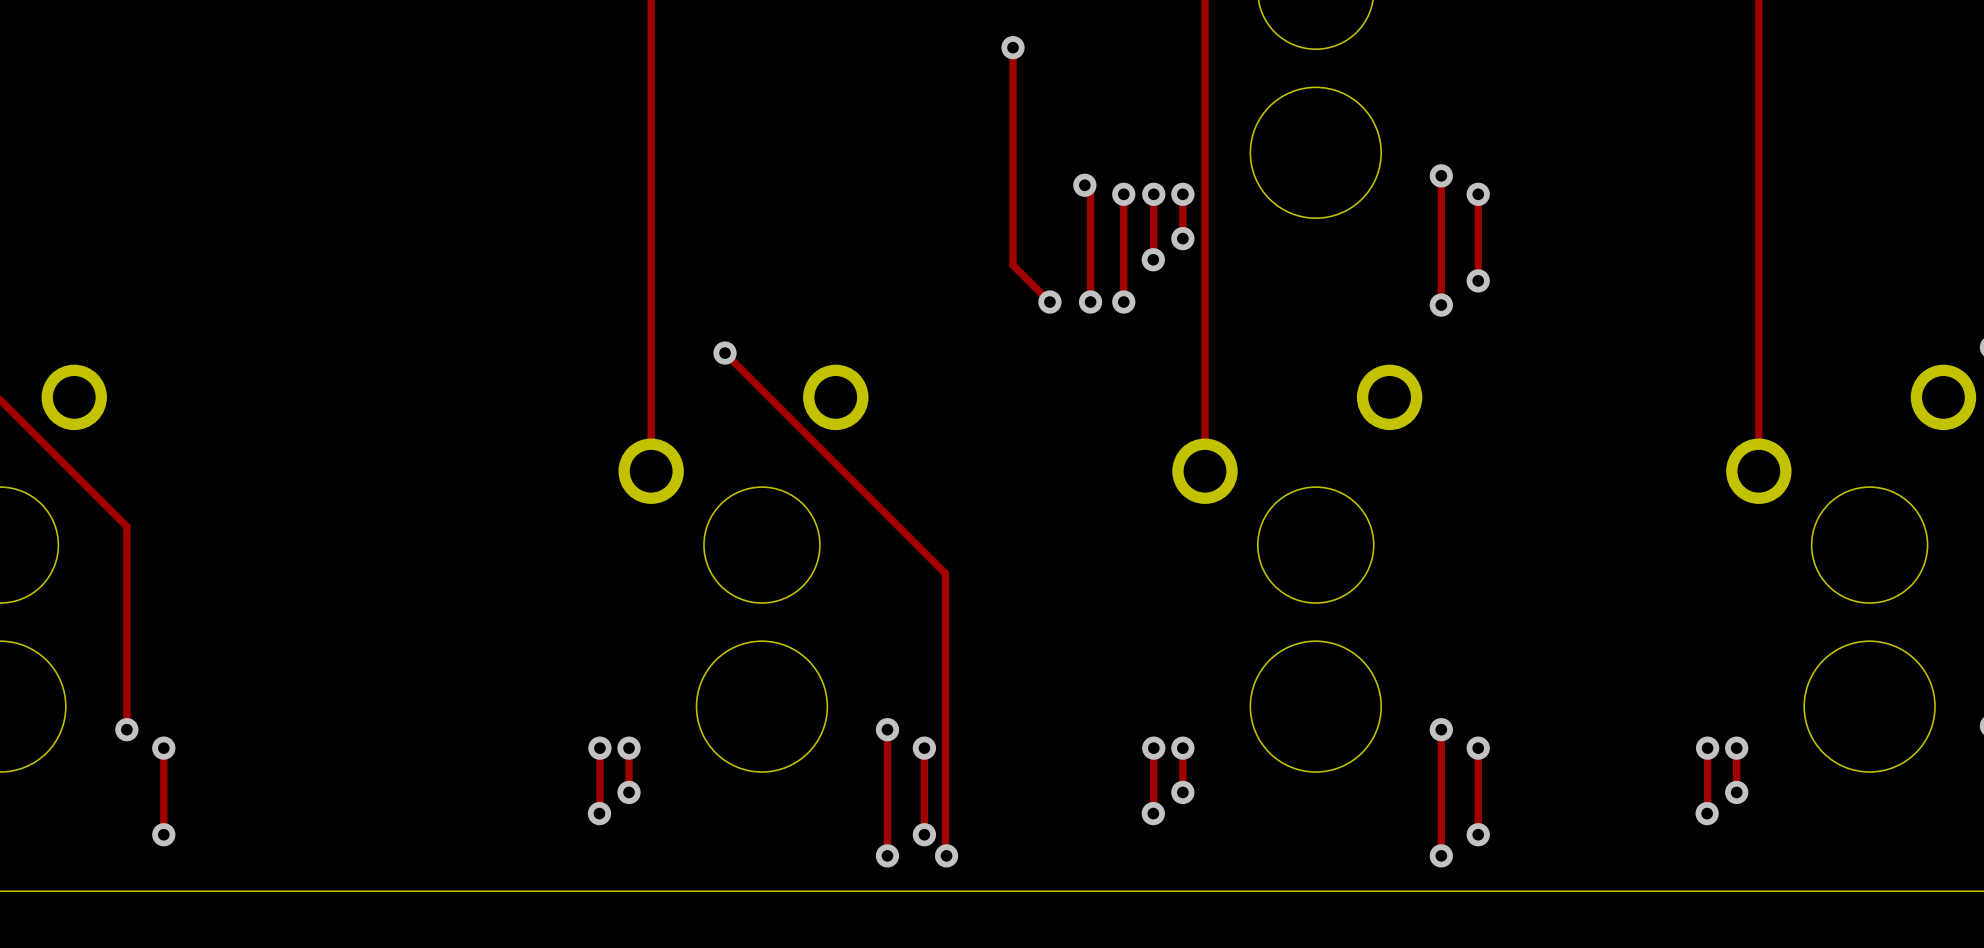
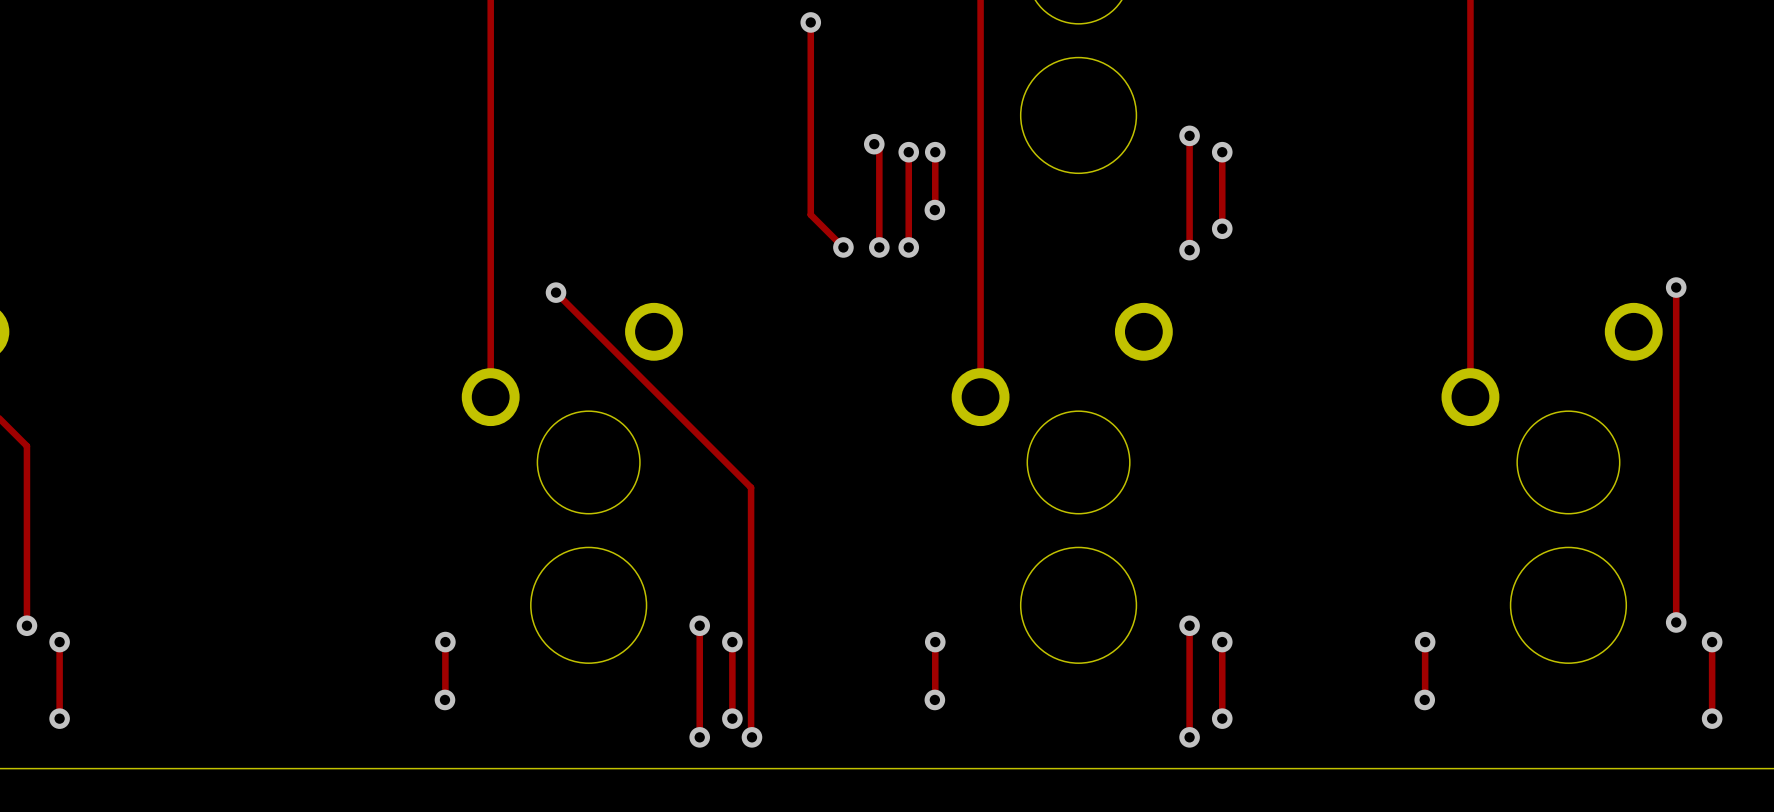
track: (1182, 194) (1182, 238) -> none
via: (1182, 194) -> none
via: (1182, 238) -> none
track: (629, 748) (629, 792) -> none
via: (629, 748) -> none
track: (1182, 748) (1182, 792) -> none
via: (1182, 748) -> none
track: (1736, 748) (1736, 792) -> none
via: (1736, 748) -> none
via: (629, 792) -> none
via: (1182, 792) -> none
via: (1736, 792) -> none

